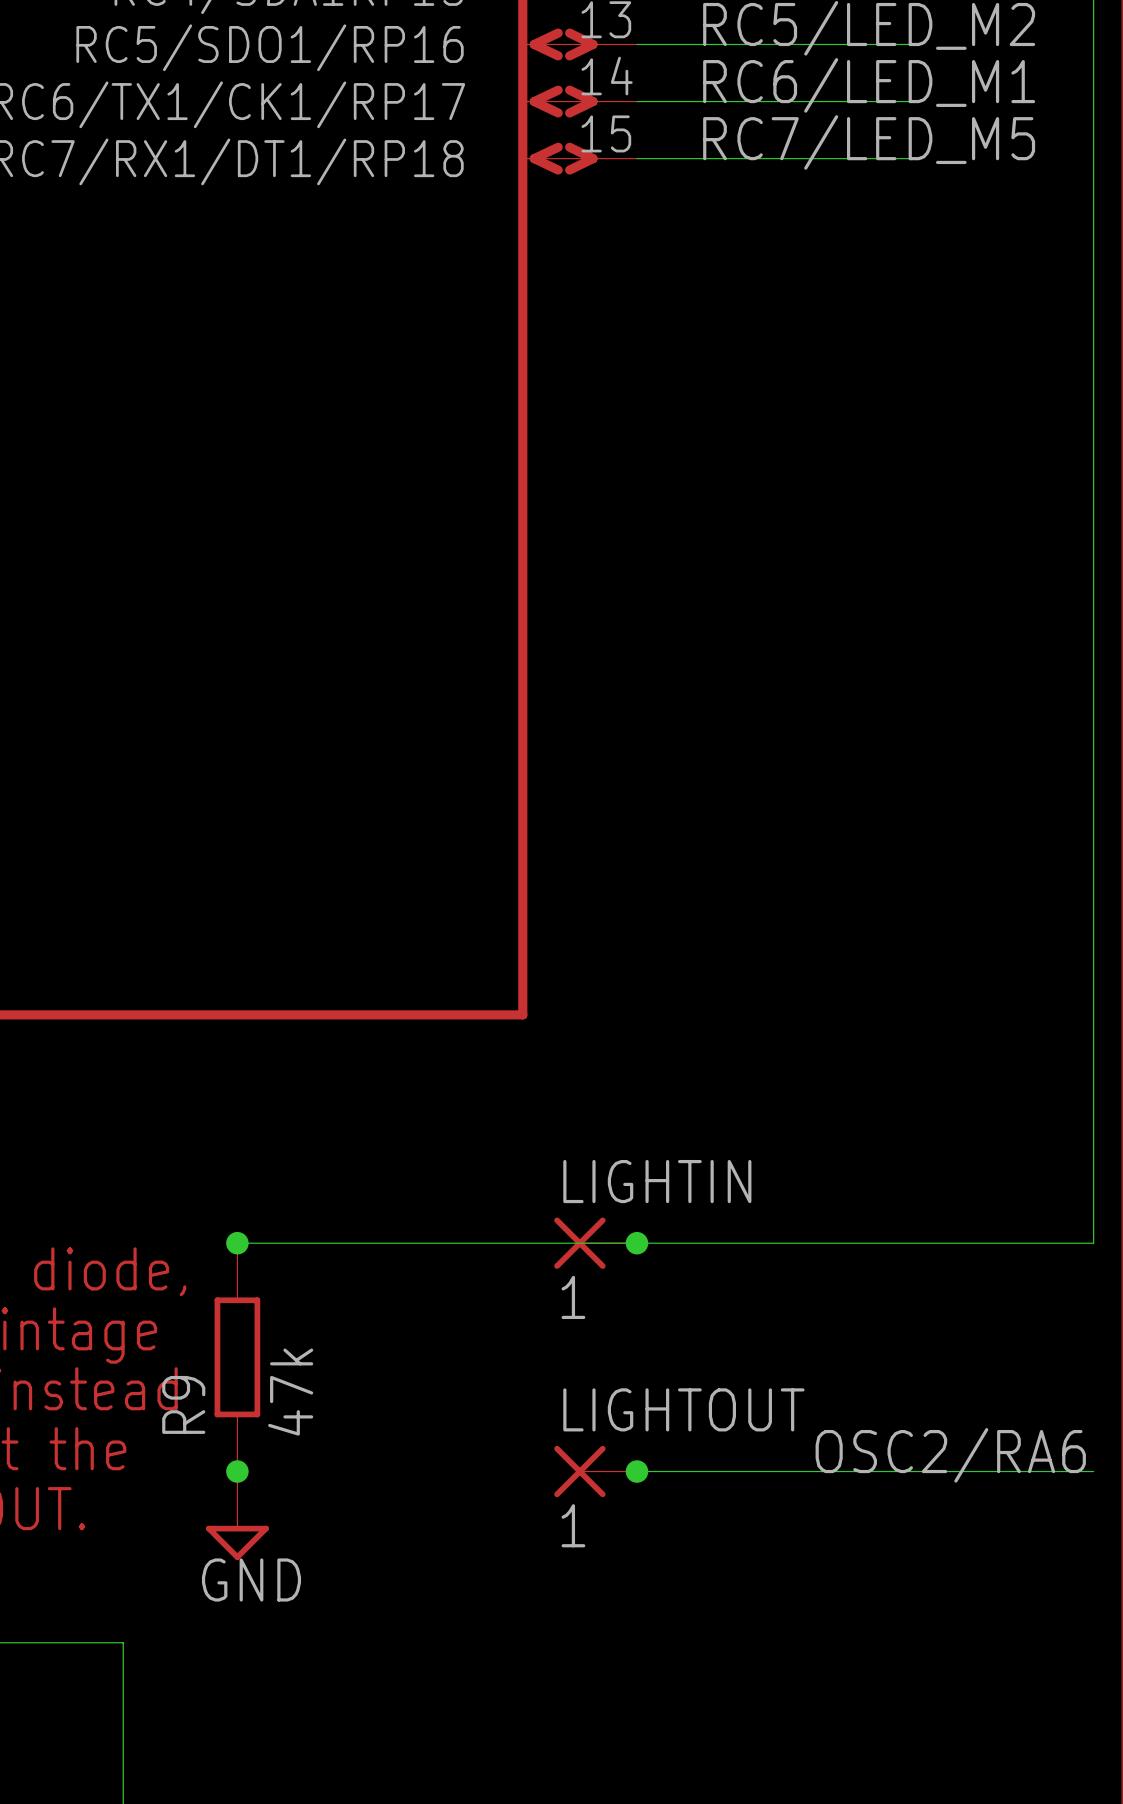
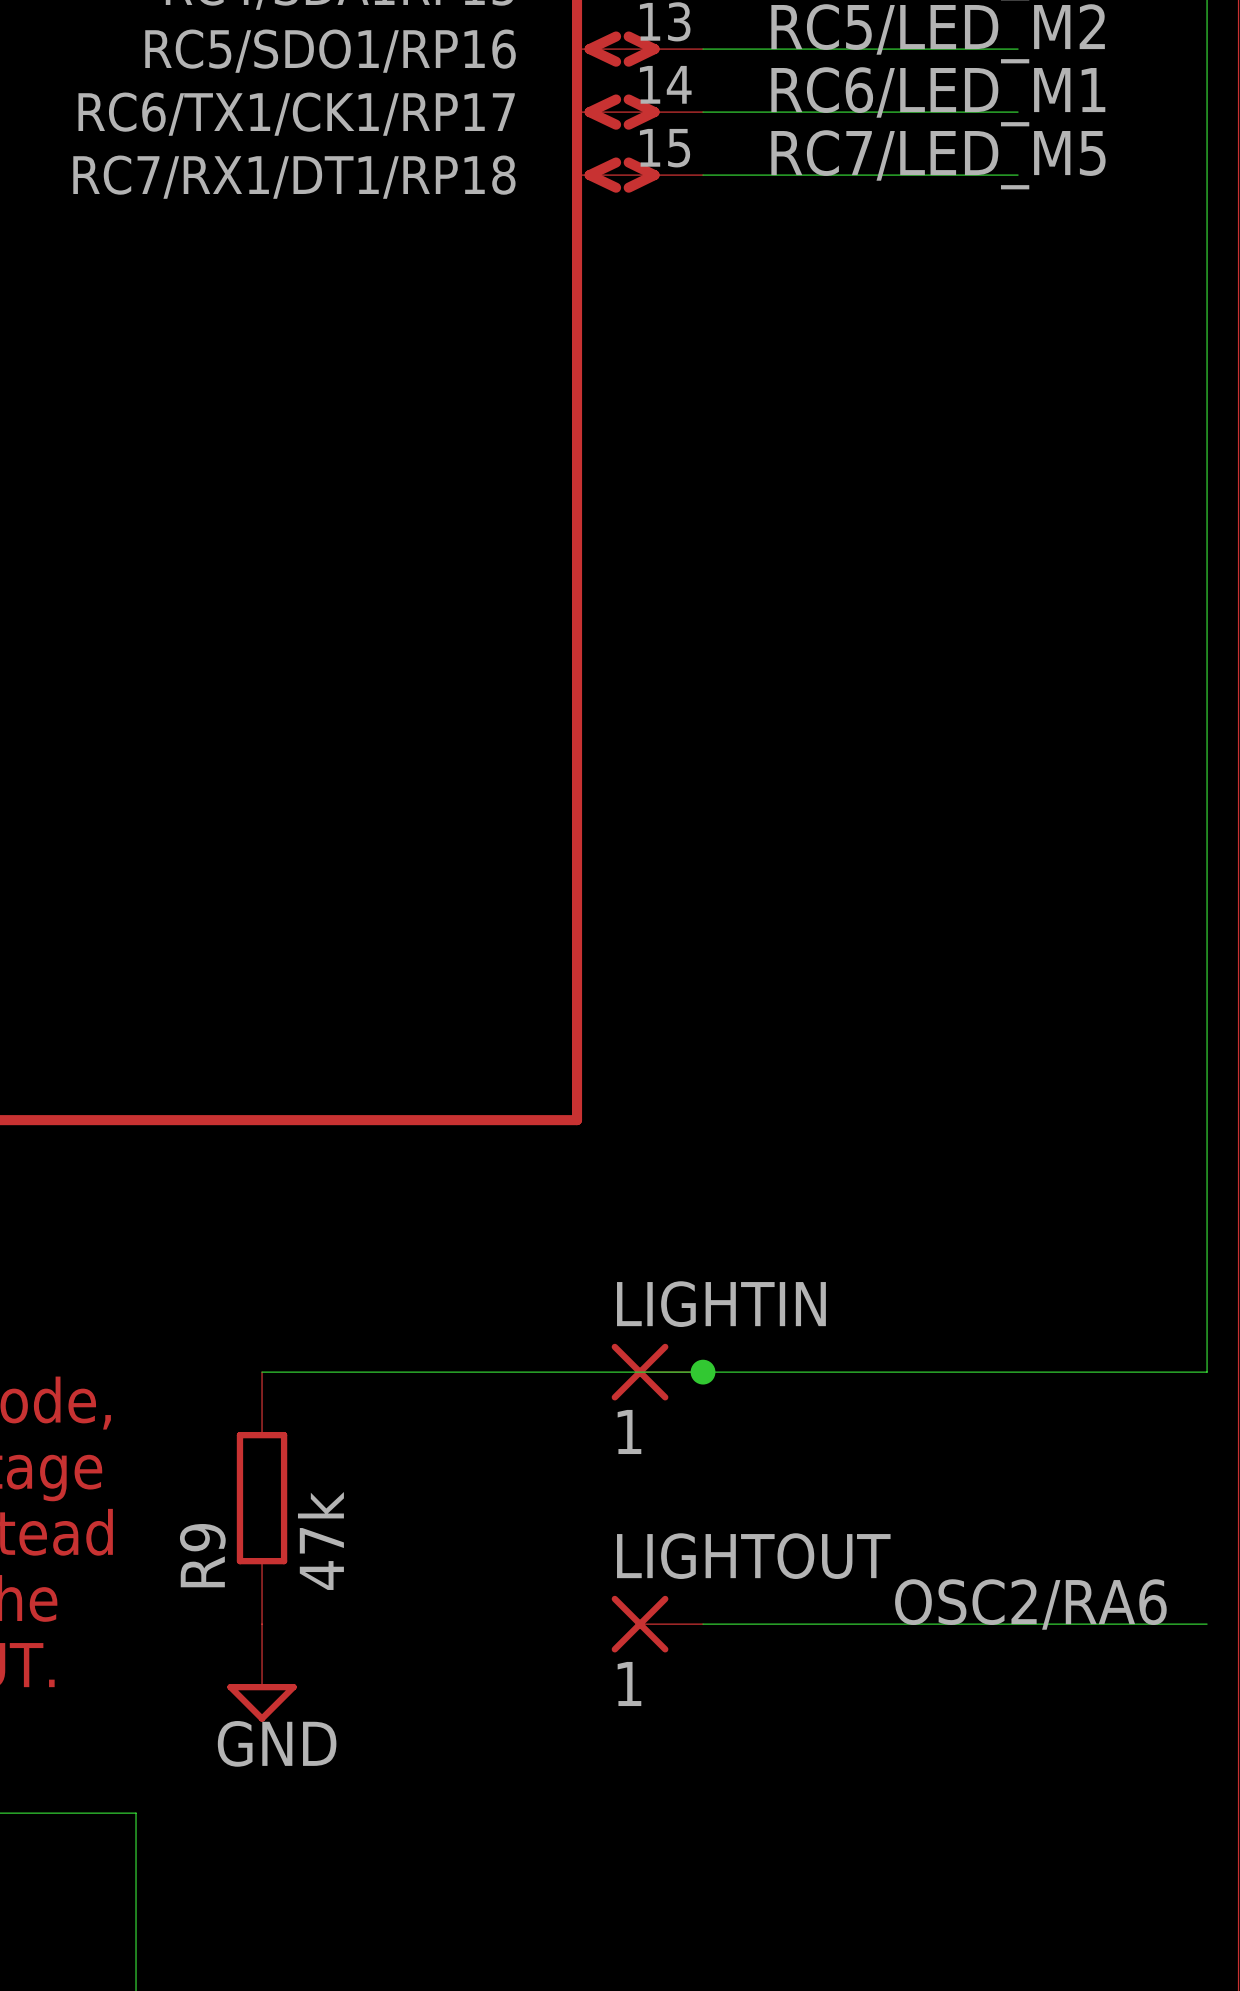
junction: (237, 1243) -> none
junction: (237, 1471) -> none
junction: (636, 1471) -> none

